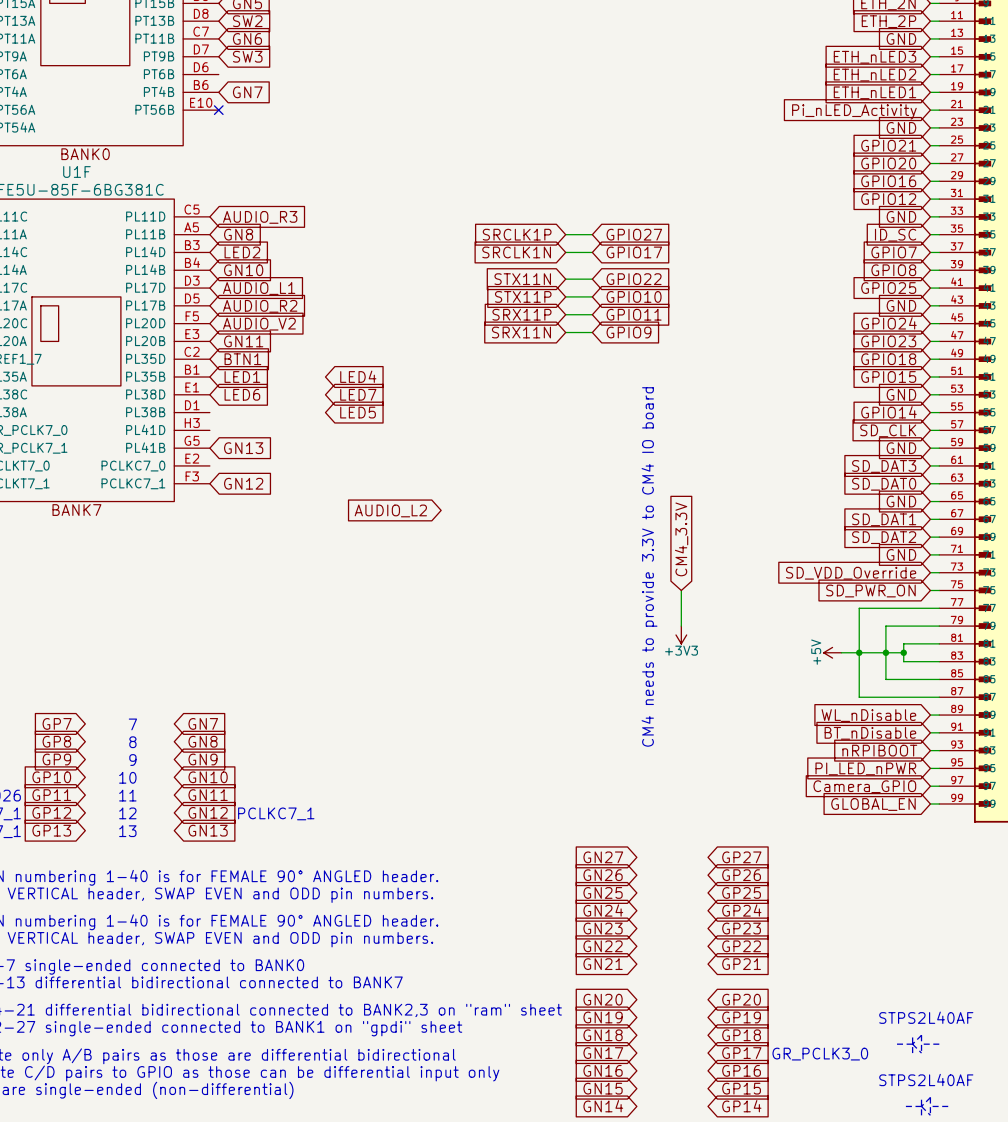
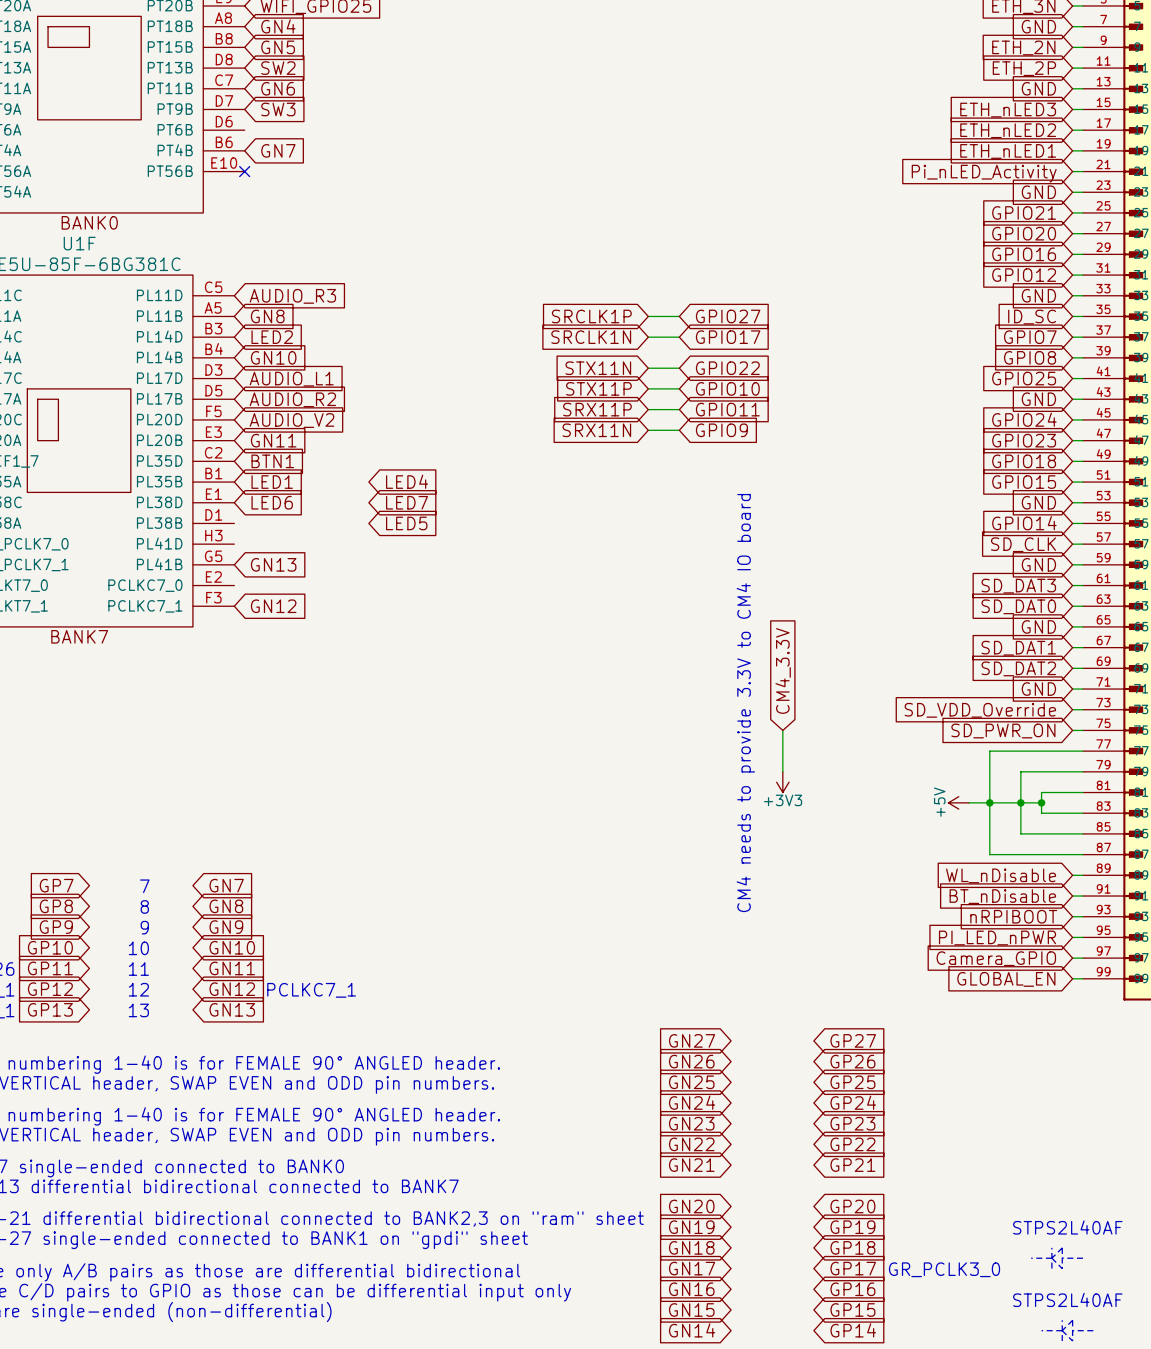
global label: AUDIO_L2 (390, 510) -> none

